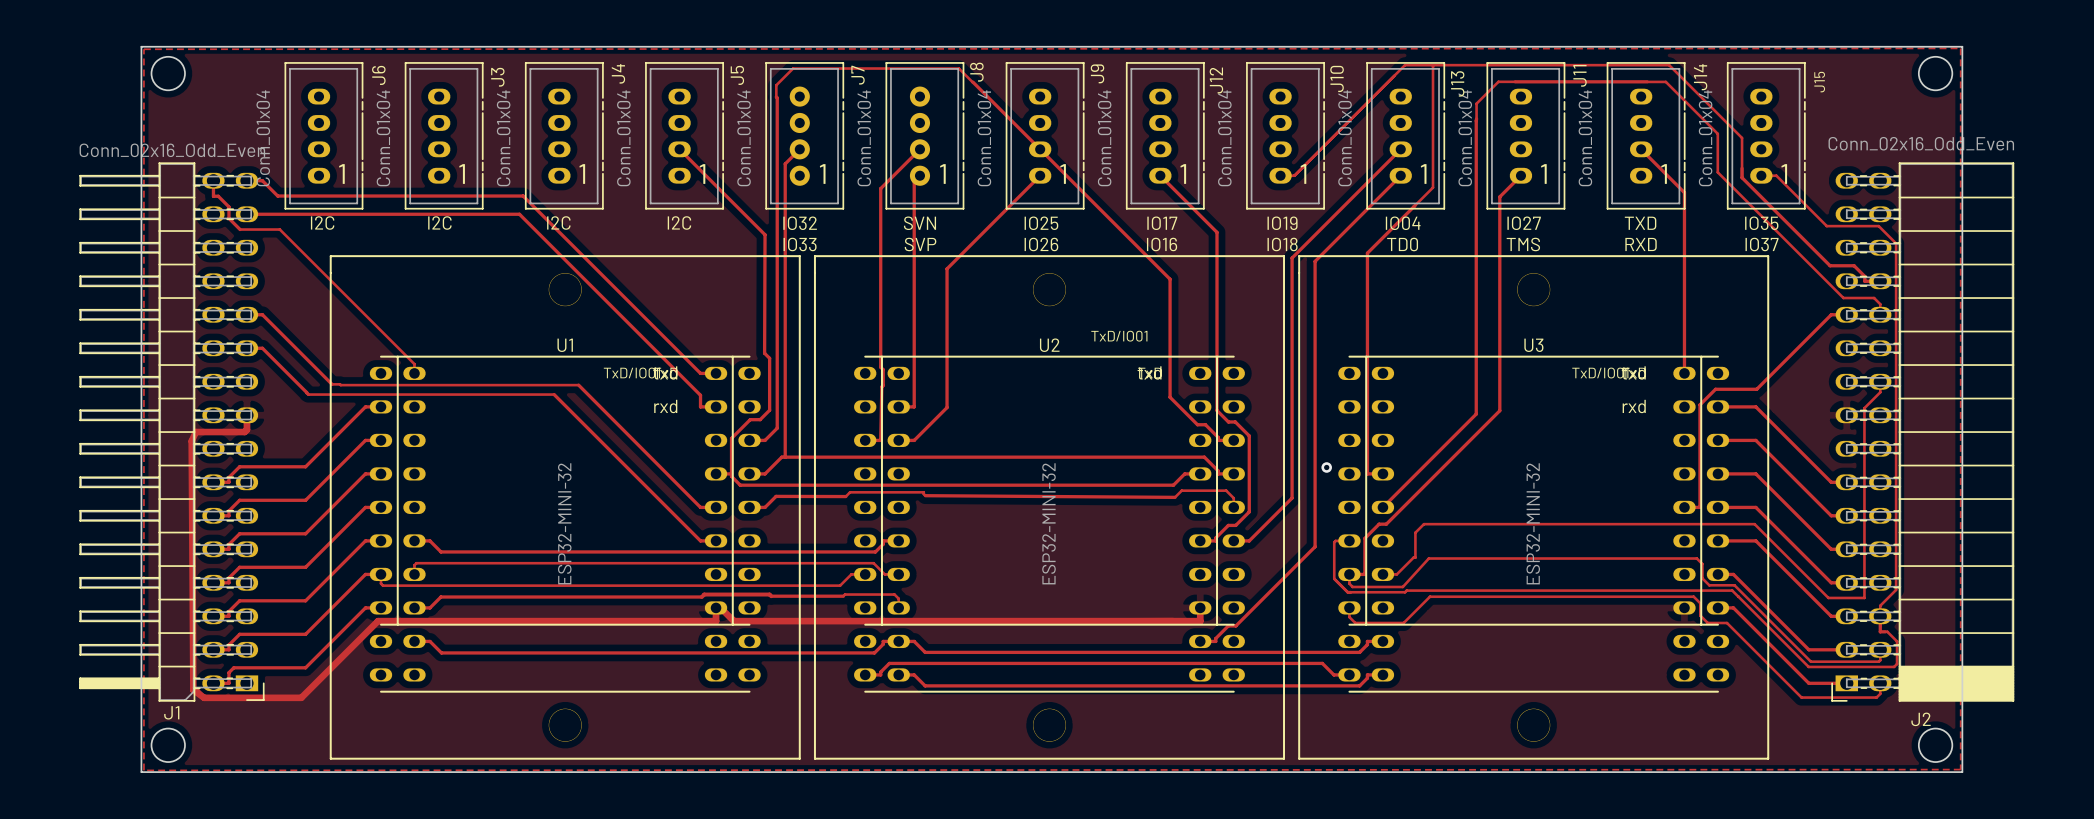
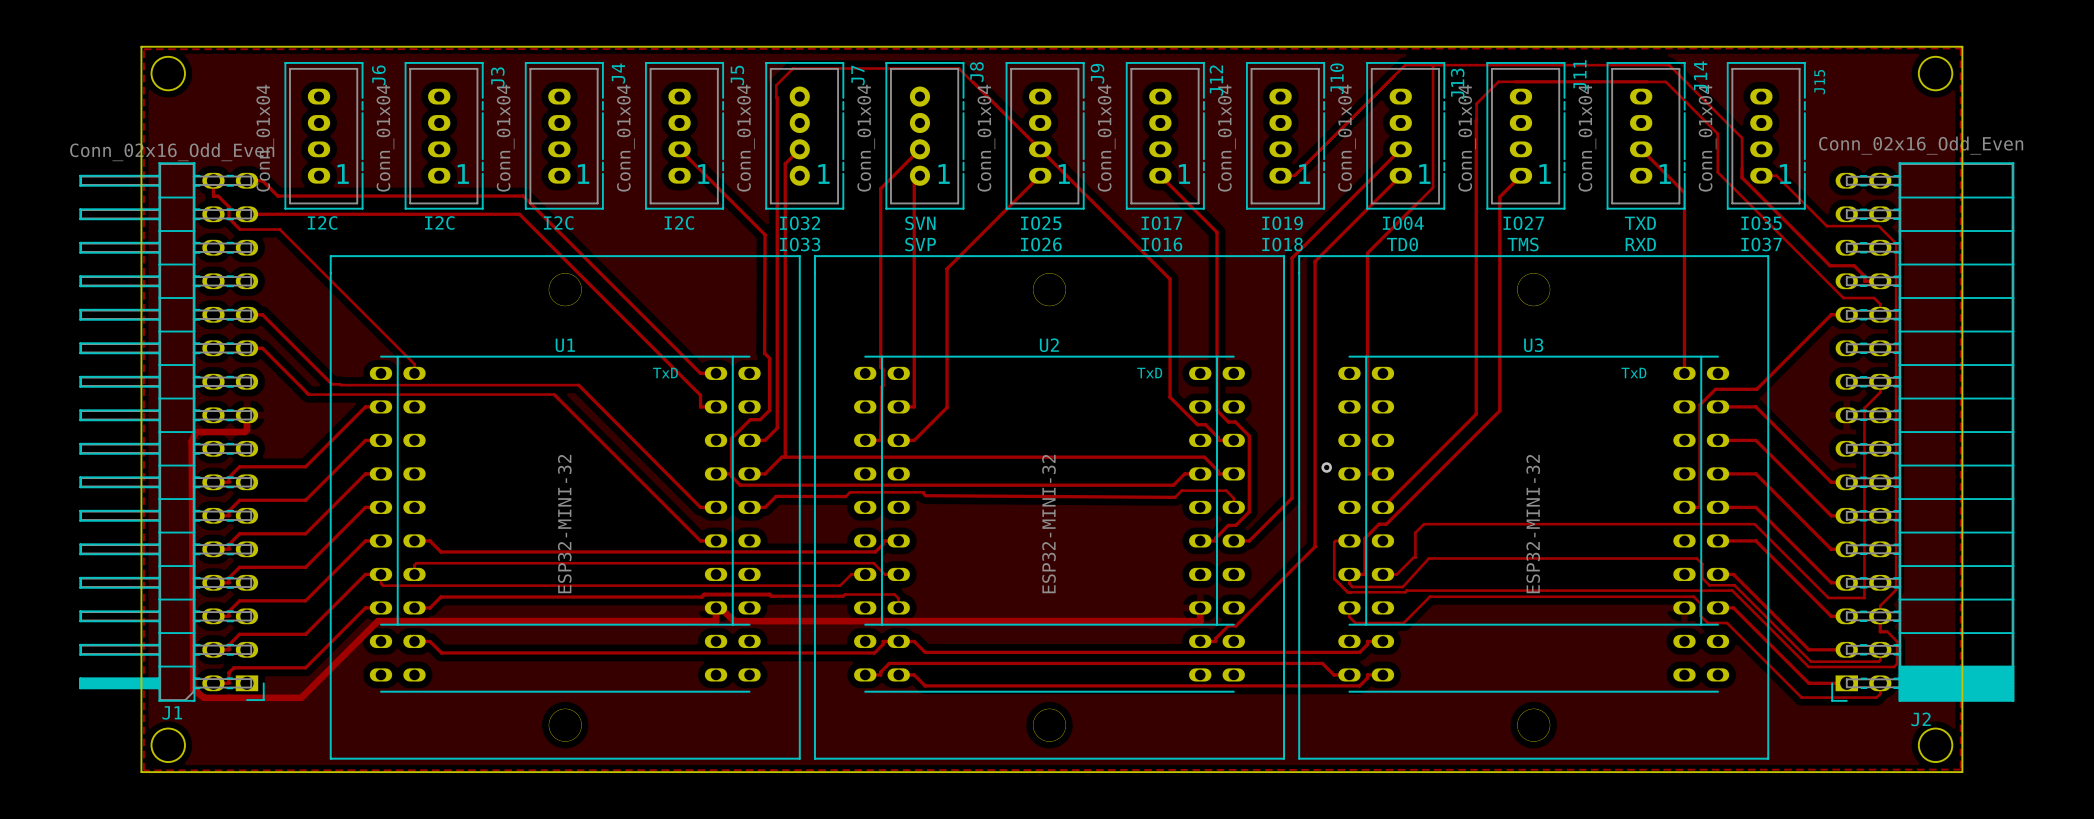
U1 footprint: [329, 255, 801, 760] -> [329, 255, 801, 760]
U2 footprint: [813, 255, 1286, 760] -> [813, 255, 1286, 760]
U3 footprint: [1298, 255, 1770, 760] -> [1298, 255, 1770, 760]

